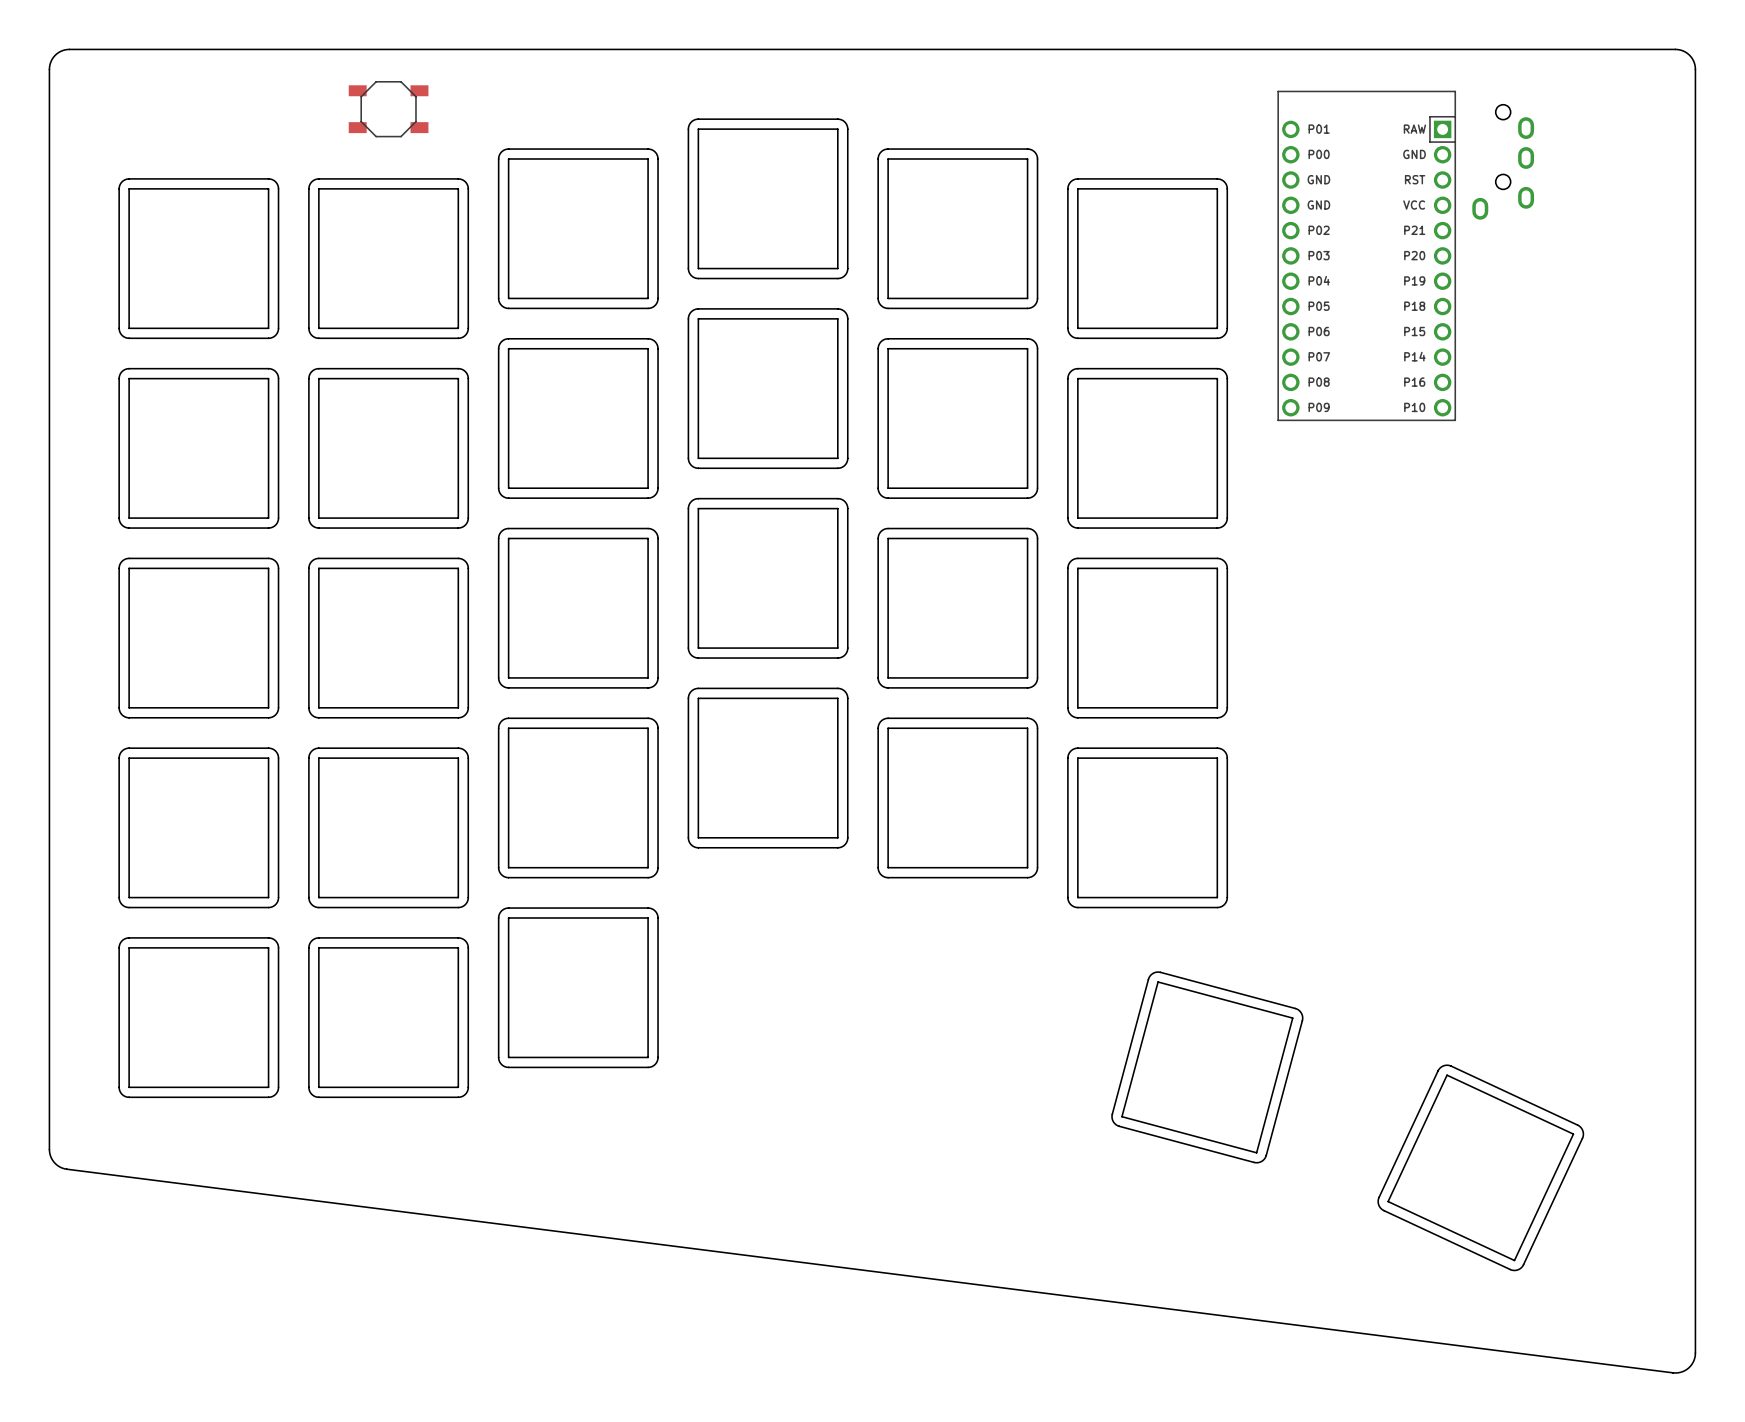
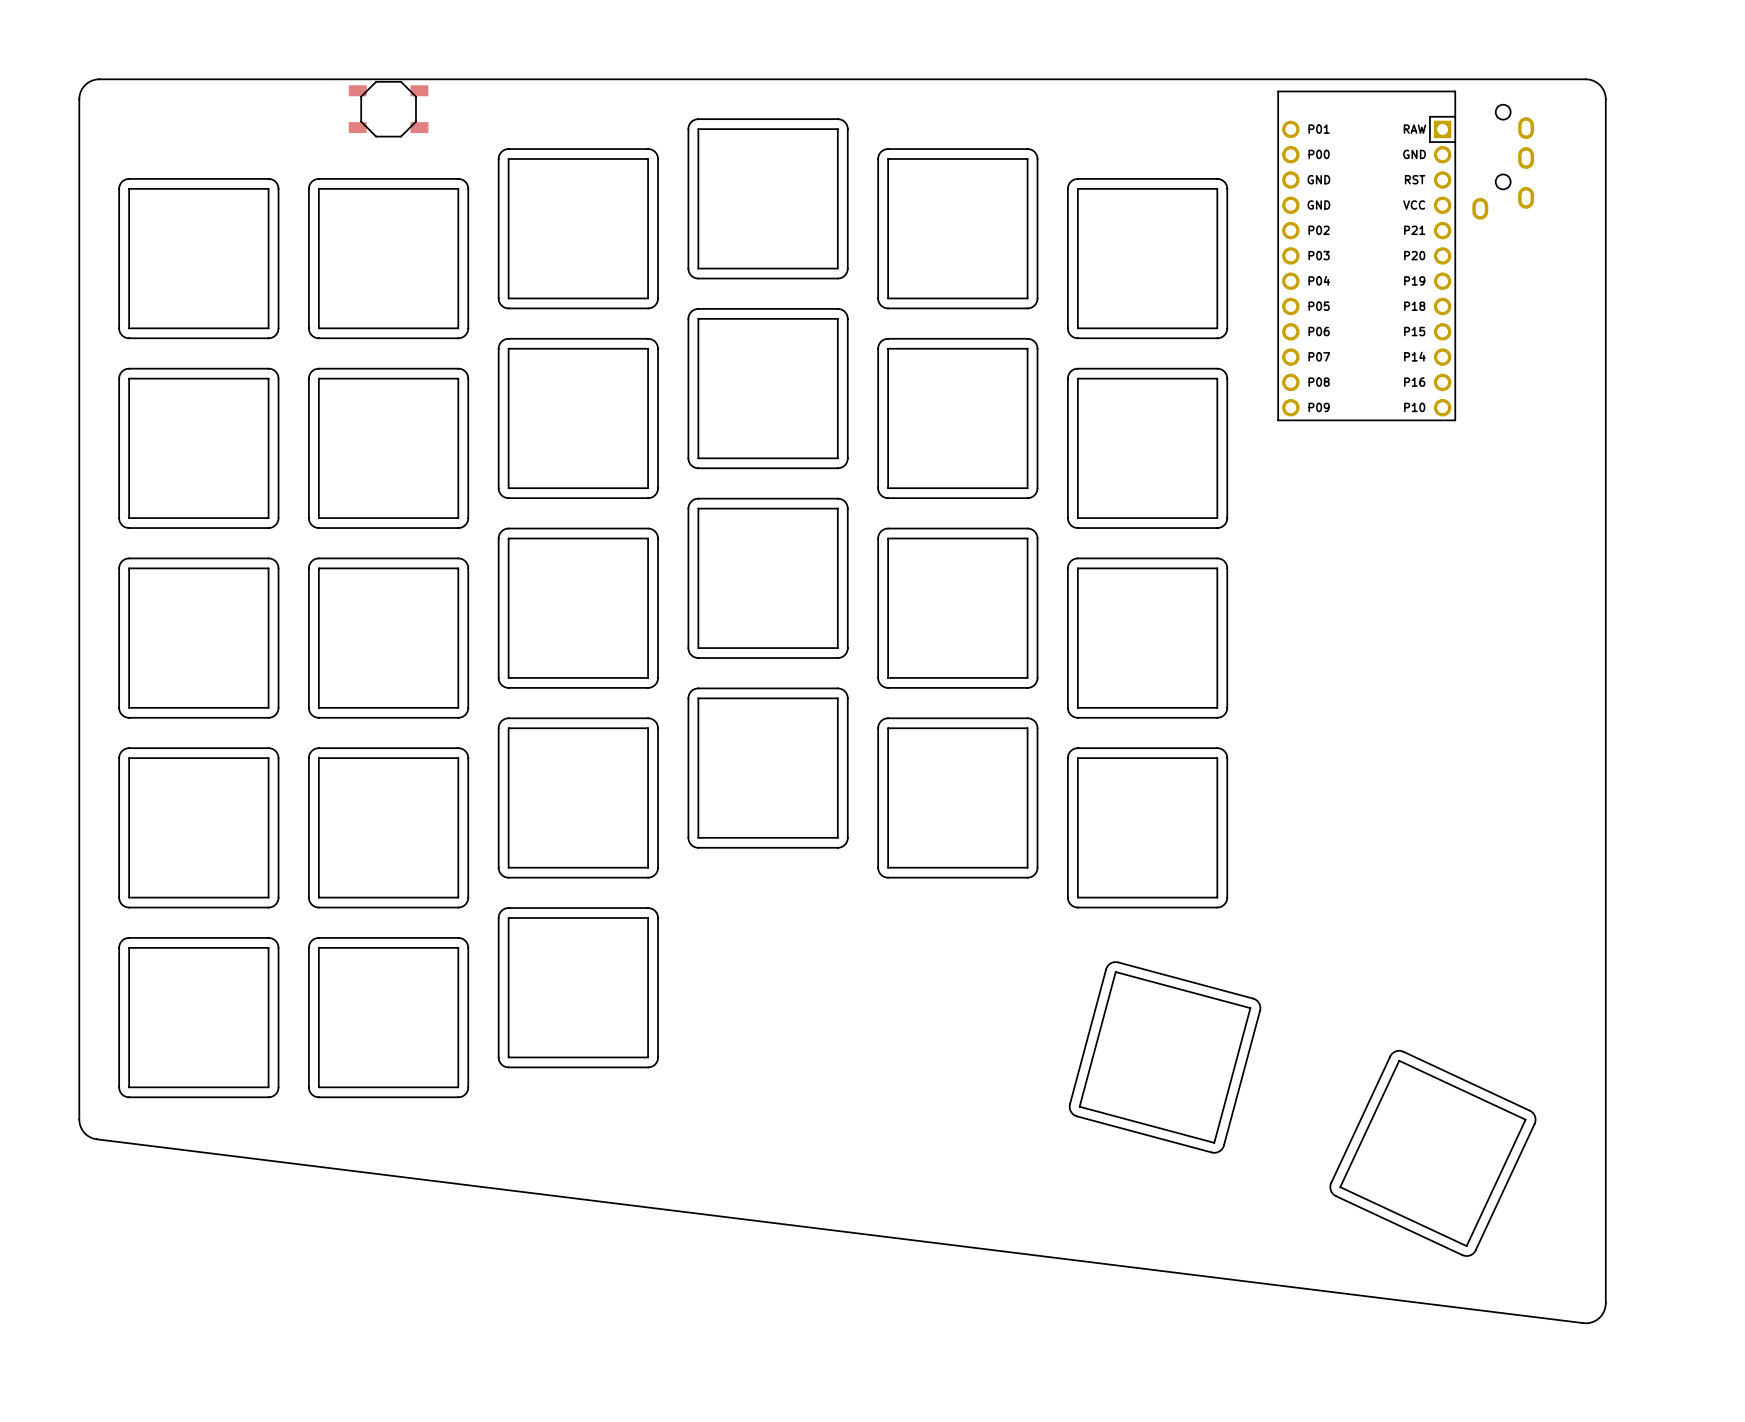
board edge: (69, 49) (1675, 49) (1687, 53) (1693, 61) (1695, 69) (1695, 1353) (1690, 1366) (1682, 1371) (1673, 1372) (66, 1169) (56, 1164) (51, 1158) (49, 1149) (49, 69) (50, 61) (55, 55) (61, 50) (69, 49) -> (99, 79) (91, 80) (85, 85) (80, 91) (79, 99) (79, 1119) (81, 1128) (86, 1134) (96, 1139) (1583, 1323) (1592, 1321) (1600, 1316) (1605, 1303) (1605, 99) (1604, 91) (1597, 83) (1585, 79) (99, 79)
board edge: (1160, 972) (1295, 1008) (1301, 1013) (1302, 1020) (1266, 1155) (1261, 1161) (1254, 1162) (1119, 1126) (1113, 1121) (1112, 1114) (1148, 979) (1153, 973) (1160, 972) -> (1118, 962) (1110, 963) (1106, 969) (1070, 1104) (1071, 1111) (1077, 1116) (1211, 1152) (1219, 1151) (1223, 1145) (1260, 1010) (1259, 1003) (1252, 998) (1118, 962)
board edge: (1158, 982) (1292, 1018) (1256, 1152) (1121, 1116) (1158, 982) -> (1115, 972) (1250, 1008) (1214, 1142) (1079, 1106) (1115, 972)
board edge: (1451, 1066) (1577, 1125) (1582, 1130) (1582, 1138) (1523, 1264) (1517, 1269) (1510, 1269) (1383, 1210) (1378, 1204) (1379, 1197) (1438, 1070) (1443, 1065) (1451, 1066) -> (1403, 1051) (1529, 1110) (1534, 1116) (1534, 1123) (1475, 1250) (1470, 1255) (1462, 1255) (1336, 1196) (1330, 1190) (1331, 1182) (1390, 1056) (1395, 1051) (1403, 1051)
board edge: (1447, 1075) (1573, 1134) (1514, 1260) (1388, 1201) (1447, 1075) -> (1399, 1060) (1525, 1119) (1466, 1246) (1340, 1187) (1399, 1060)

